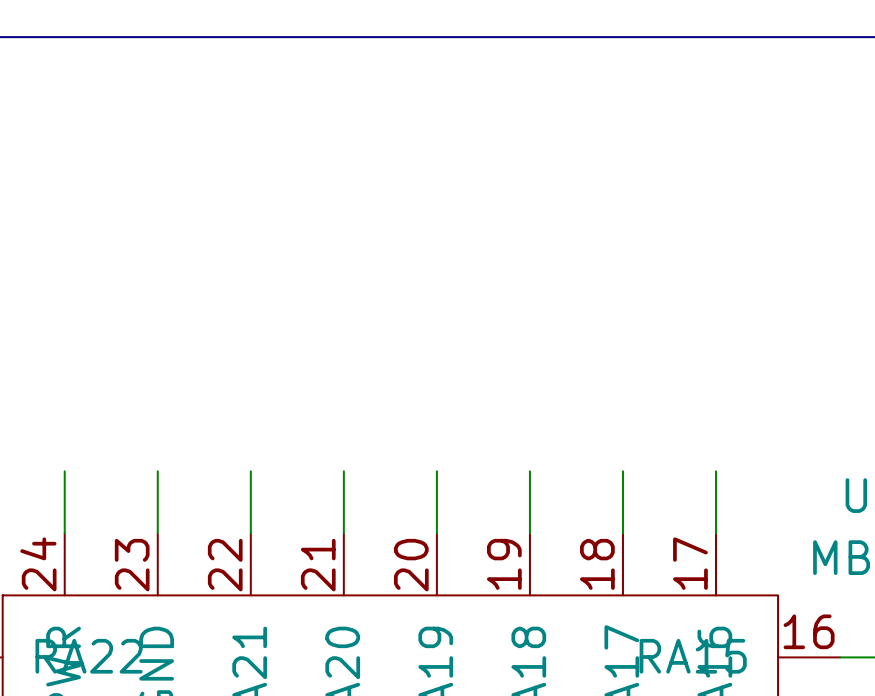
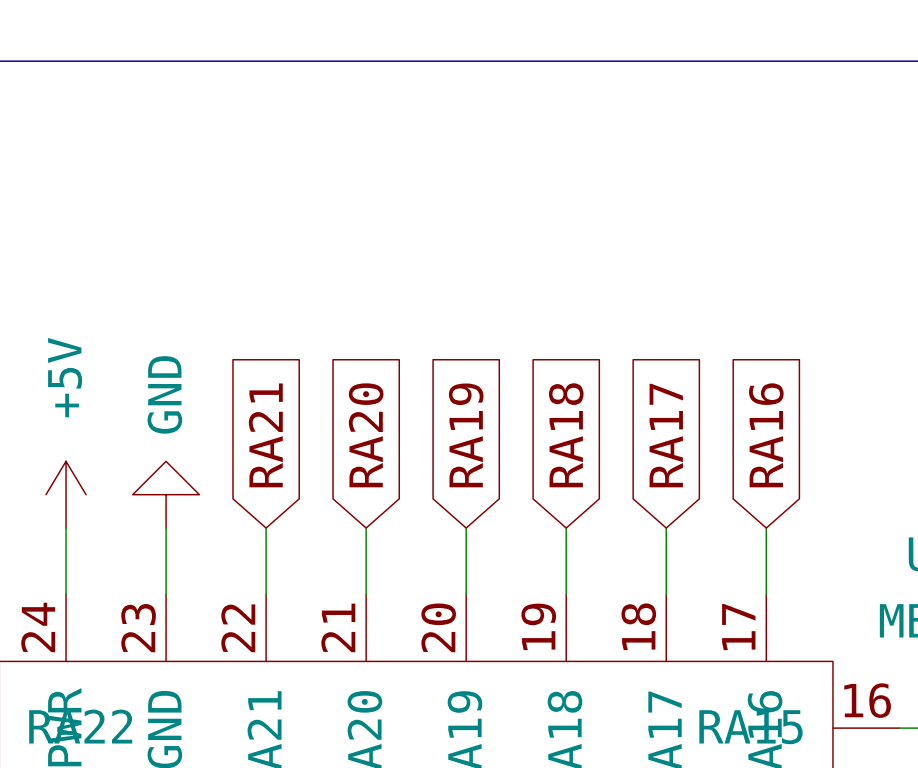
global label: none -> RA21 (265, 435)
global label: none -> RA20 (366, 435)
global label: none -> RA19 (466, 435)
global label: none -> RA18 (566, 435)
global label: none -> RA17 (666, 435)
global label: none -> RA16 (766, 435)
power symbol: none -> +5V (66, 494)
power symbol: none -> GND (166, 494)

